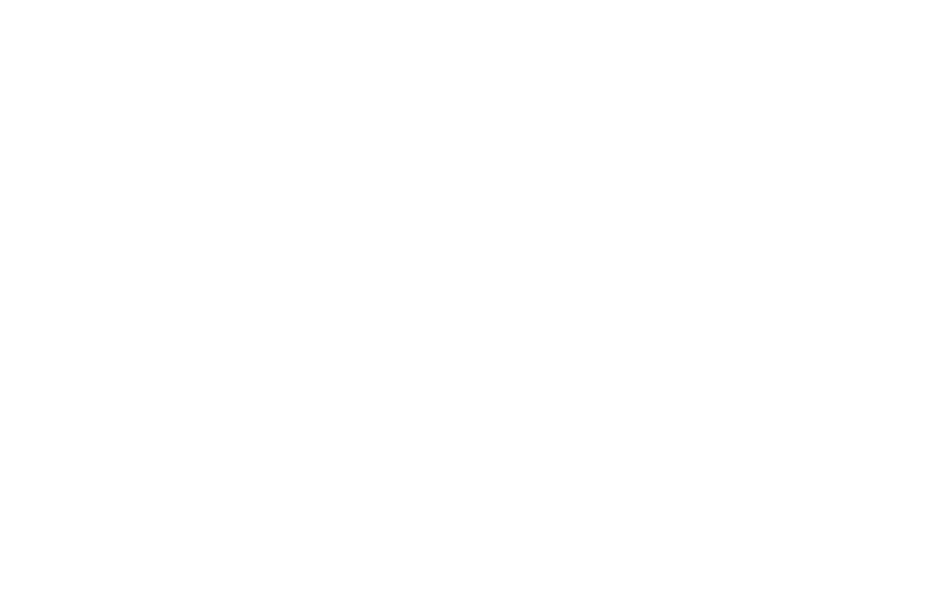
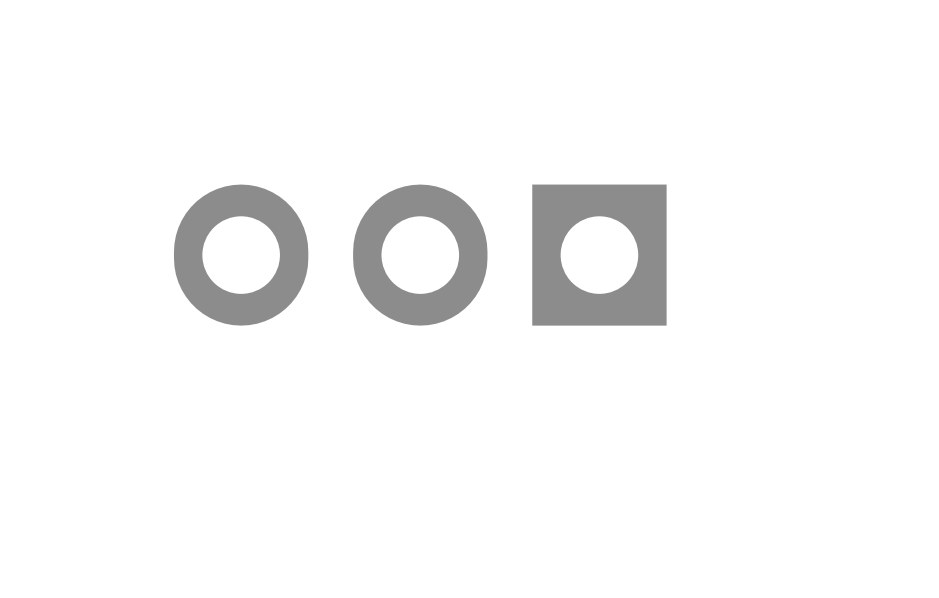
part: none -> (420, 255)

